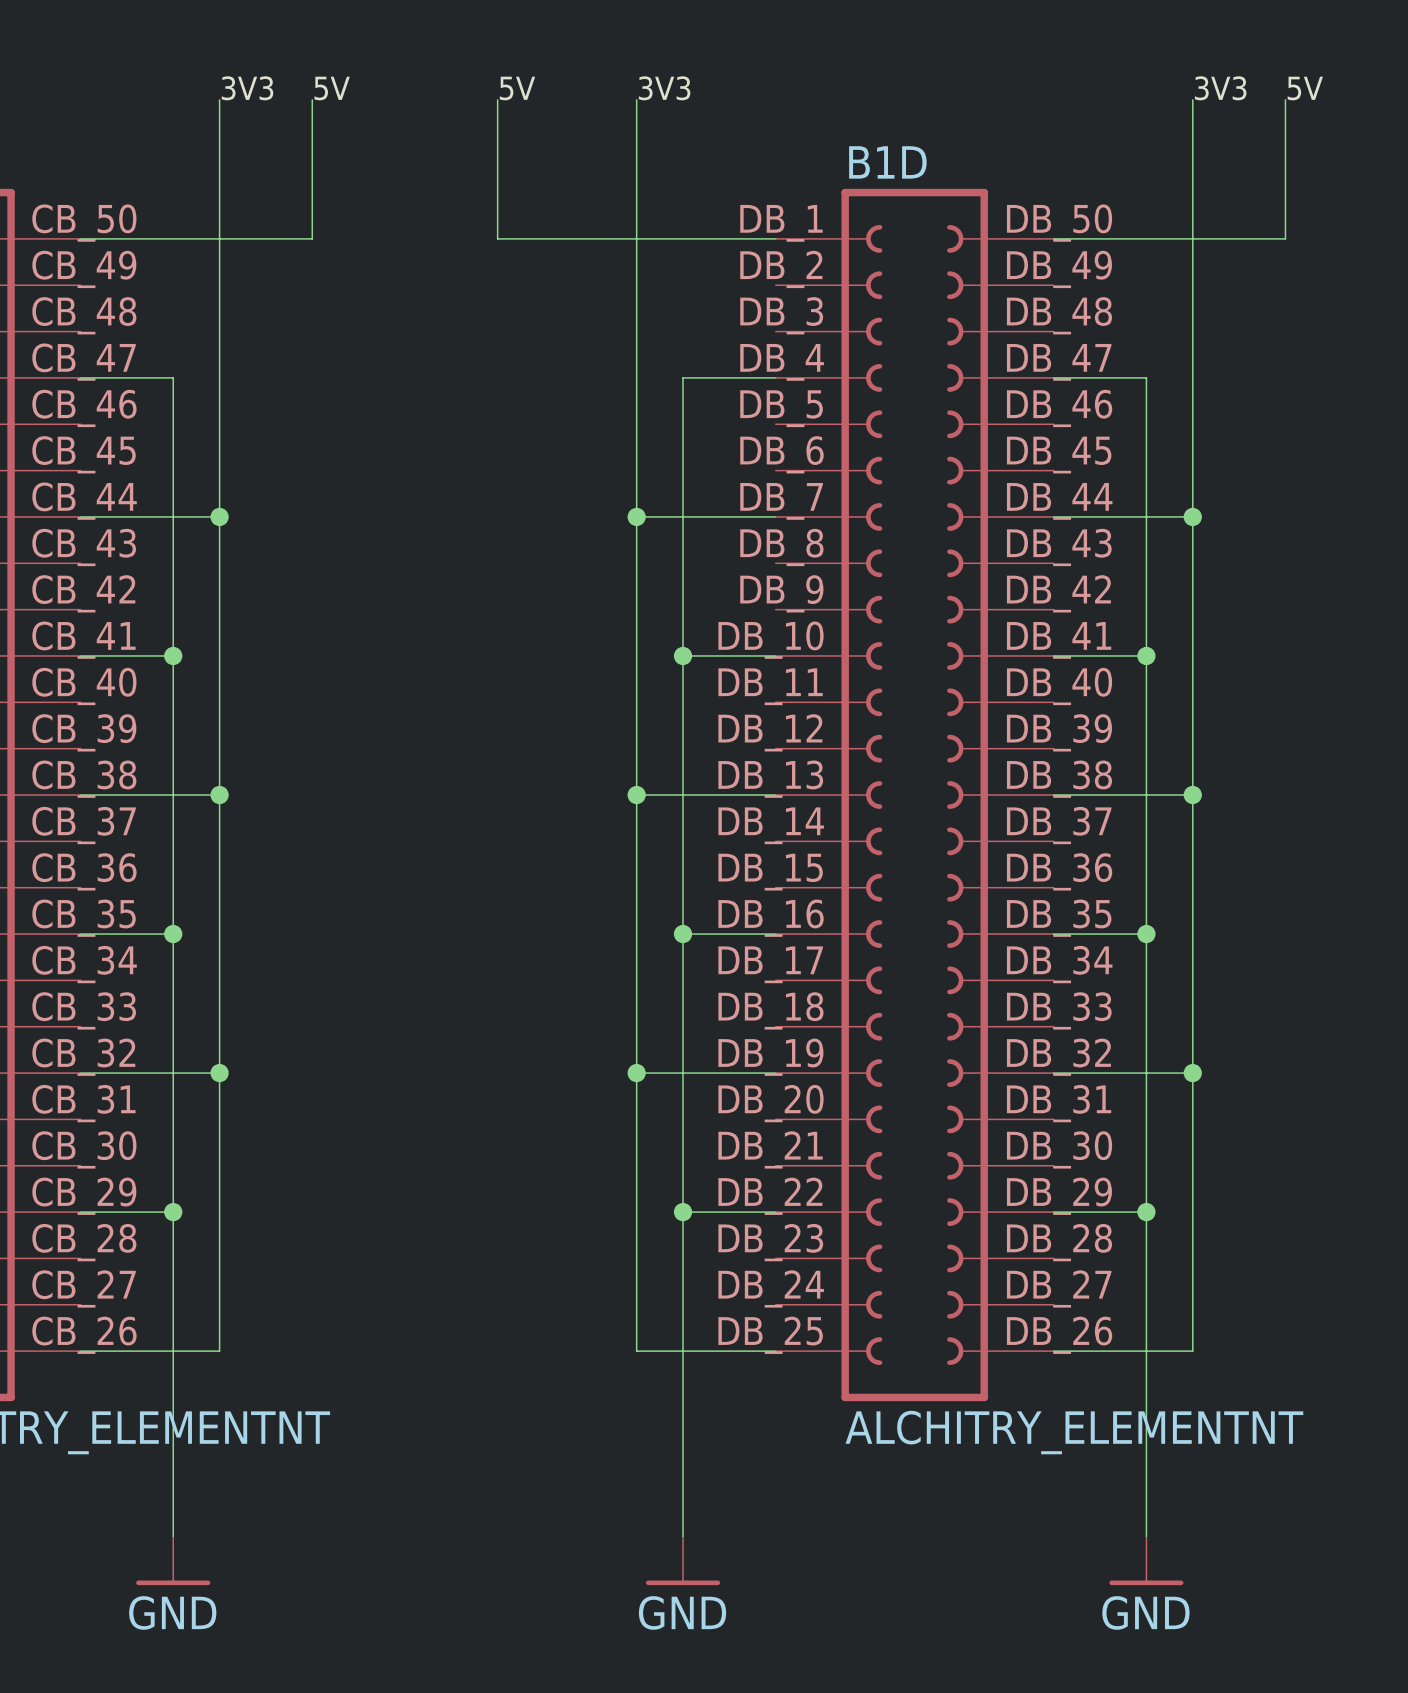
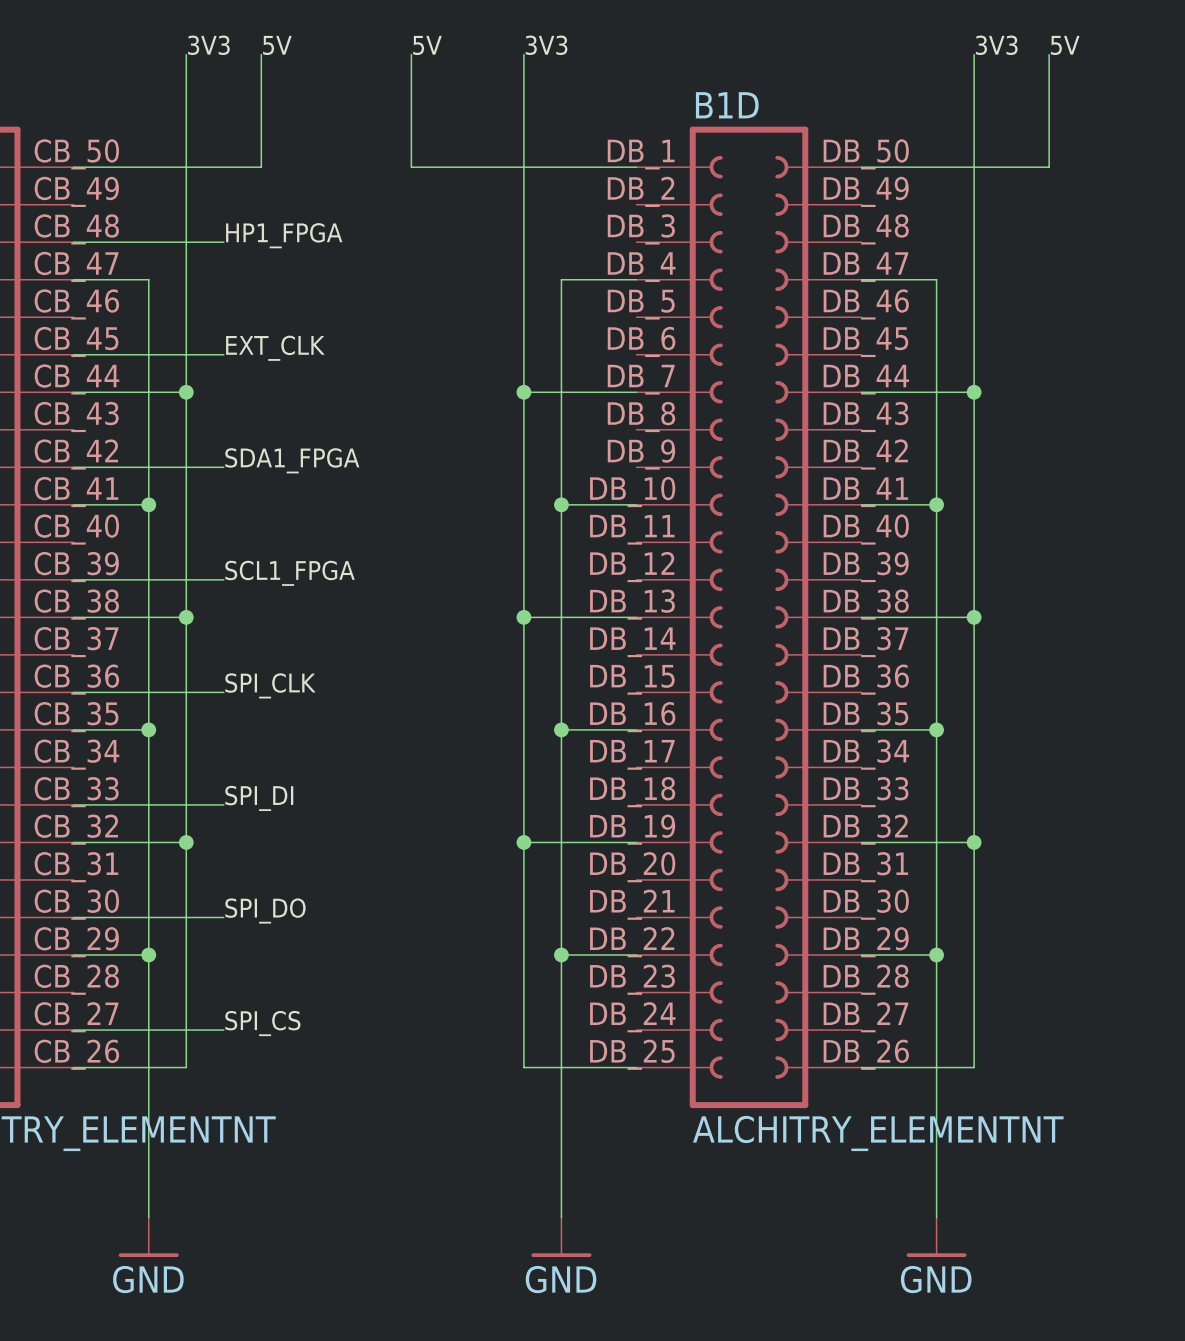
label: none -> HP1_FPGA (284, 235)
wire: none -> (73, 242) (223, 242)
label: none -> EXT_CLK (275, 348)
wire: none -> (73, 354) (223, 354)
label: none -> SDA1_FPGA (292, 460)
wire: none -> (73, 467) (223, 467)
label: none -> SCL1_FPGA (290, 573)
wire: none -> (73, 579) (223, 579)
label: none -> SPI_CLK (270, 685)
wire: none -> (73, 692) (223, 692)
label: none -> SPI_DI (259, 798)
wire: none -> (73, 804) (223, 804)
label: none -> SPI_DO (265, 910)
wire: none -> (73, 917) (223, 917)
label: none -> SPI_CS (262, 1023)
wire: none -> (73, 1030) (223, 1030)

